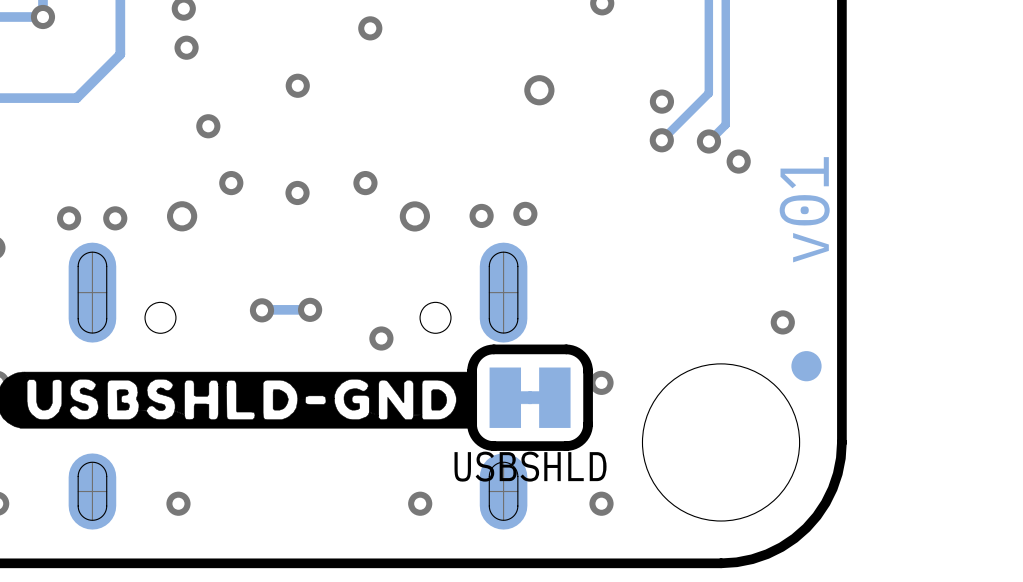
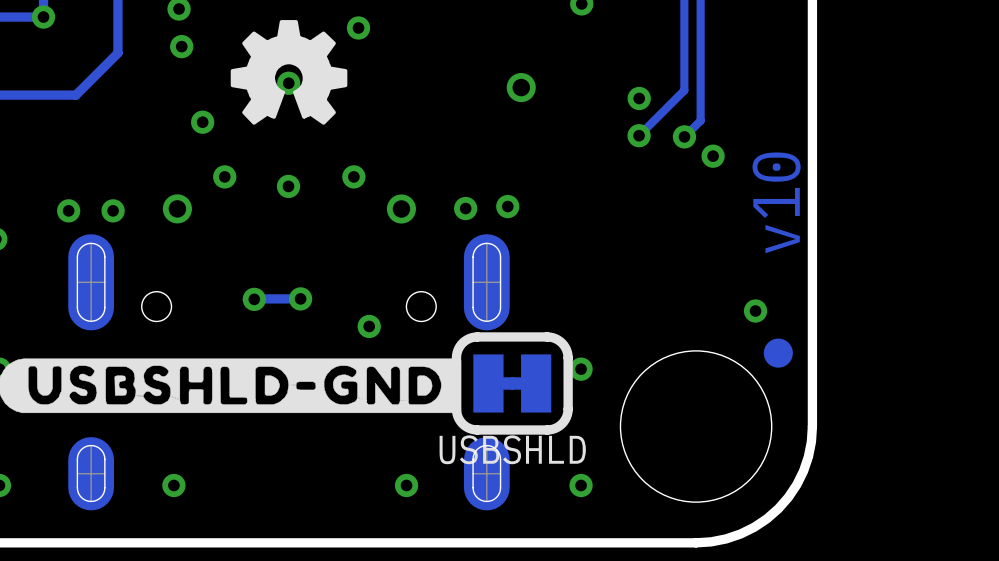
drawing: none -> [230, 20, 348, 125]
text: v01 (804, 209) -> v10 (776, 202)

